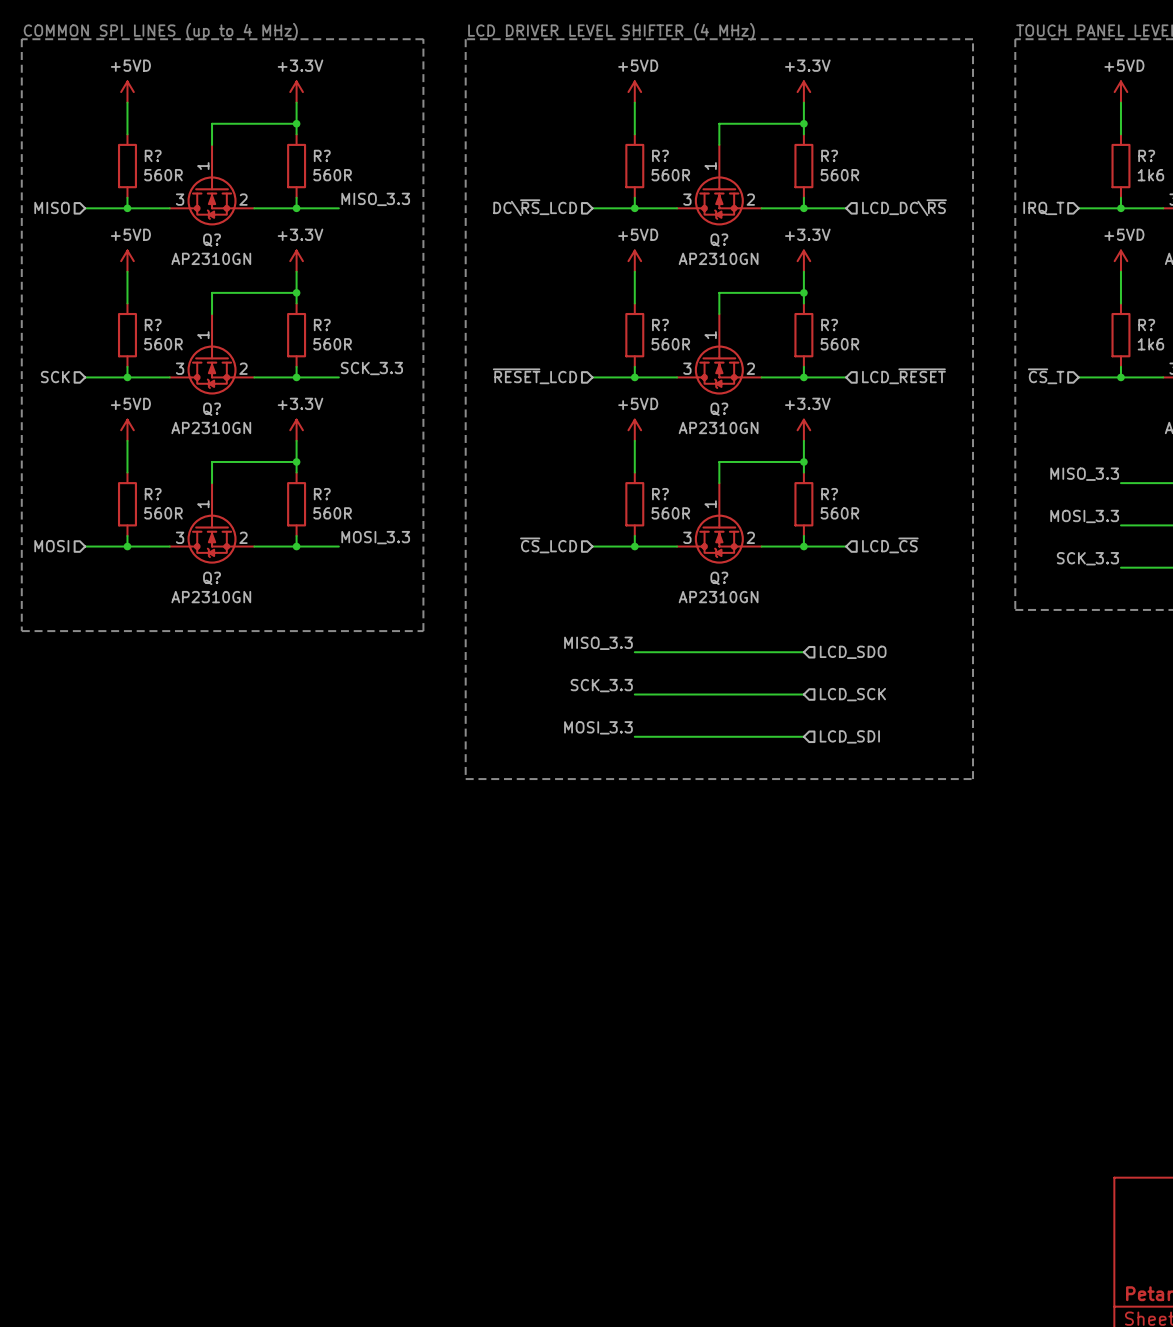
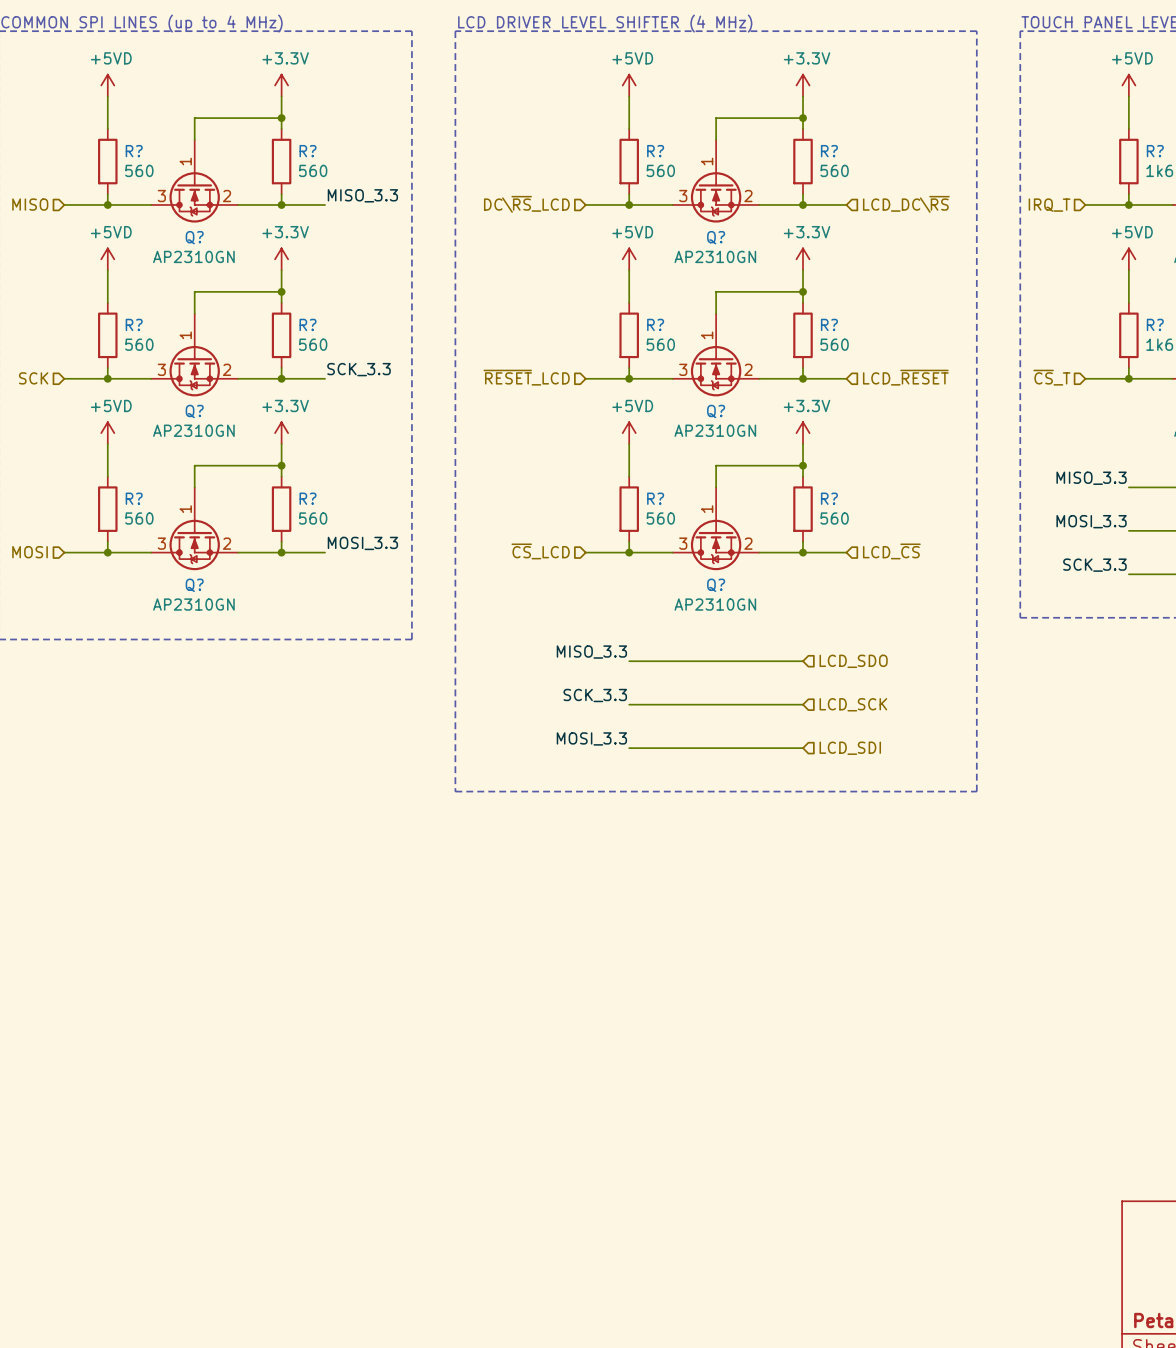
R? value: 560R (163, 175) -> 560 (139, 170)
R? value: 560R (332, 175) -> 560 (313, 170)
R? value: 560R (670, 175) -> 560 (660, 170)
R? value: 560R (839, 175) -> 560 (834, 170)
R? value: 560R (163, 344) -> 560 (139, 344)
R? value: 560R (332, 344) -> 560 (313, 344)
R? value: 560R (670, 344) -> 560 (660, 344)
R? value: 560R (839, 344) -> 560 (834, 344)
R? value: 560R (163, 513) -> 560 (139, 518)
R? value: 560R (332, 513) -> 560 (313, 518)
R? value: 560R (670, 513) -> 560 (660, 518)
R? value: 560R (839, 513) -> 560 (834, 518)

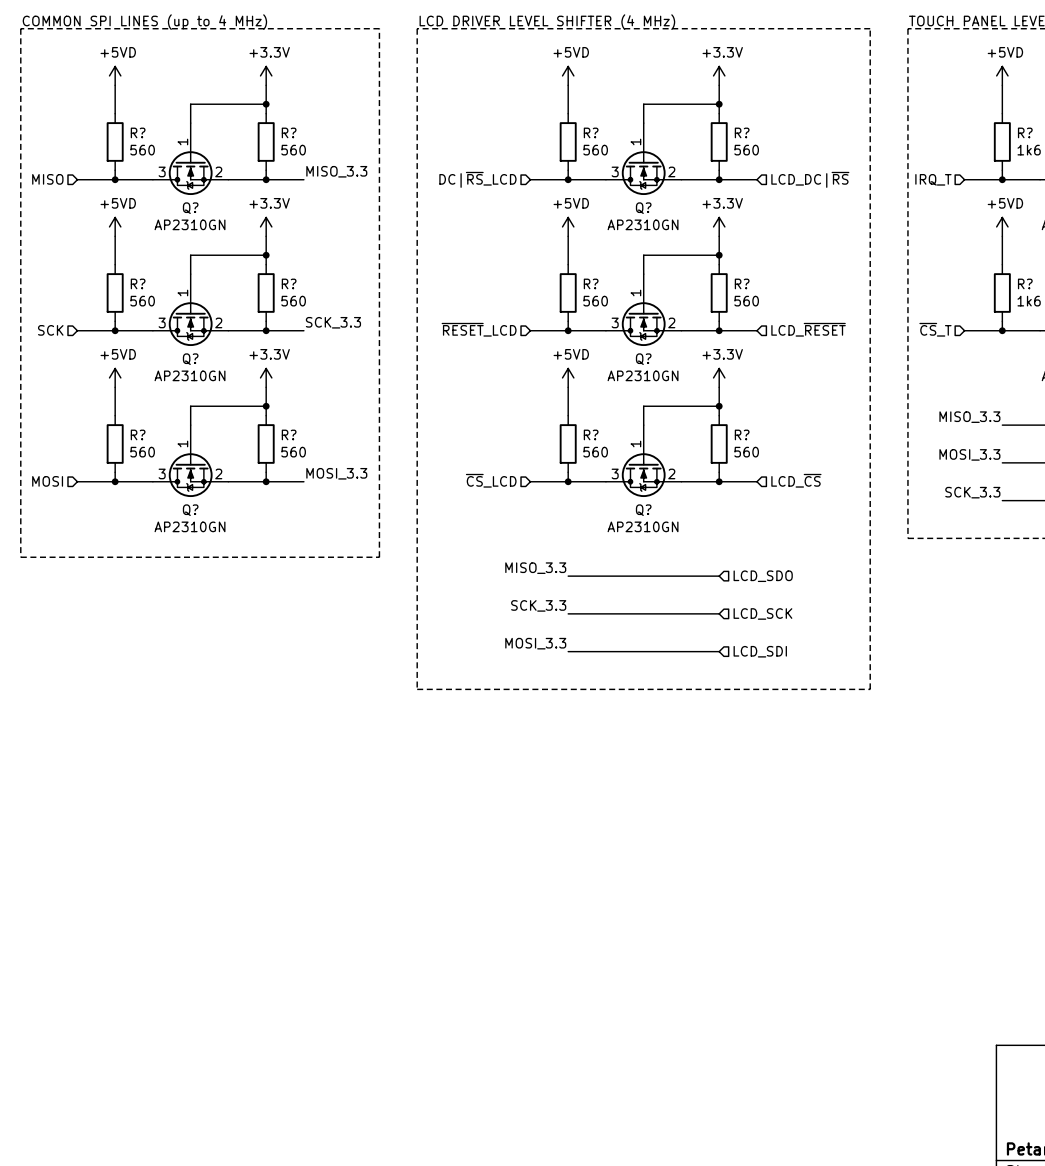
hierarchical label: DC\~{RS}_LCD (526, 204) -> DC|~{RS}_LCD (477, 179)
hierarchical label: LCD_DC\~{RS} (906, 204) -> LCD_DC|~{RS} (810, 179)

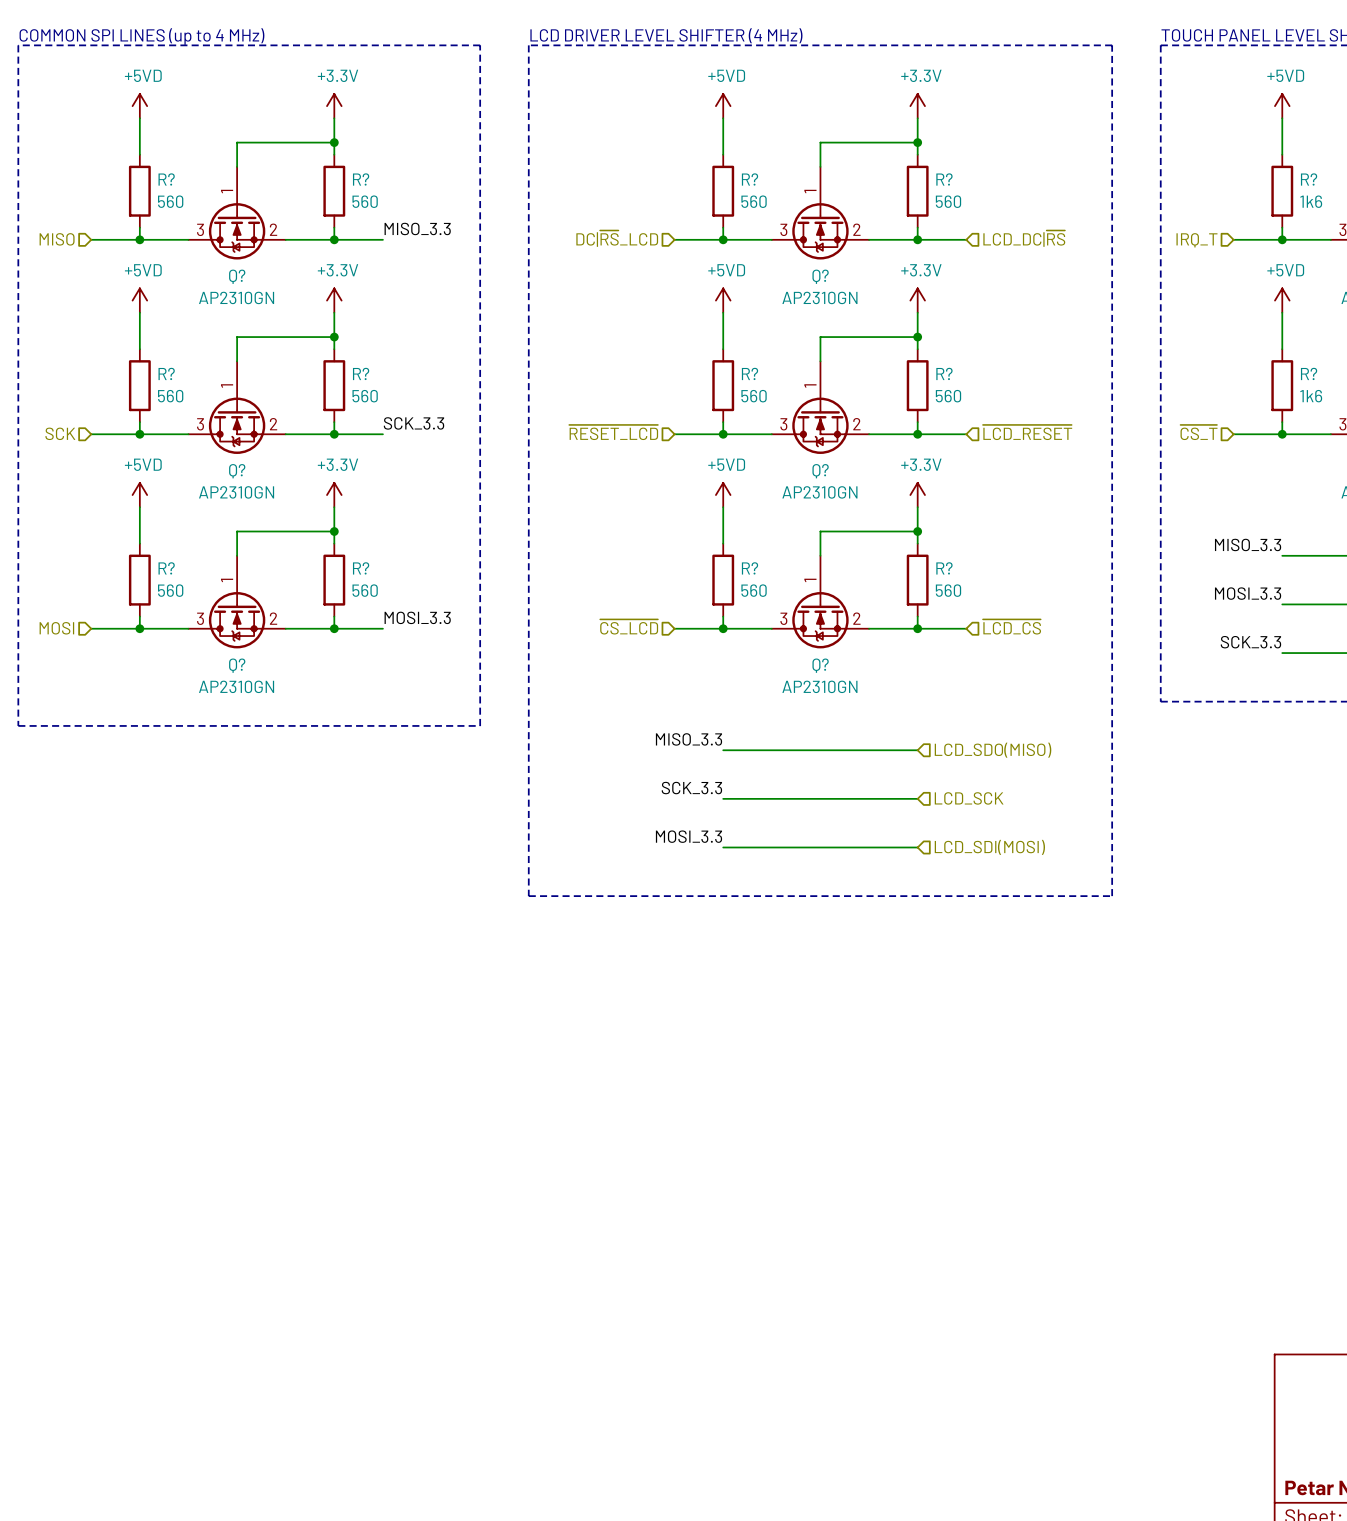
hierarchical label: ~{RESET}_LCD (479, 329) -> ~{RESET_LCD} (613, 432)
hierarchical label: LCD_~{RESET} (808, 329) -> ~{LCD_RESET} (1027, 432)
hierarchical label: ~{CS}_T (935, 329) -> ~{CS_T} (1198, 432)
hierarchical label: ~{CS}_LCD (491, 480) -> ~{CS_LCD} (629, 626)
hierarchical label: LCD_~{CS} (796, 480) -> ~{LCD_CS} (1011, 626)
hierarchical label: LCD_SDO (763, 576) -> LCD_SDO(MISO) (993, 750)
hierarchical label: LCD_SDI (760, 651) -> LCD_SDI(MOSI) (989, 847)

